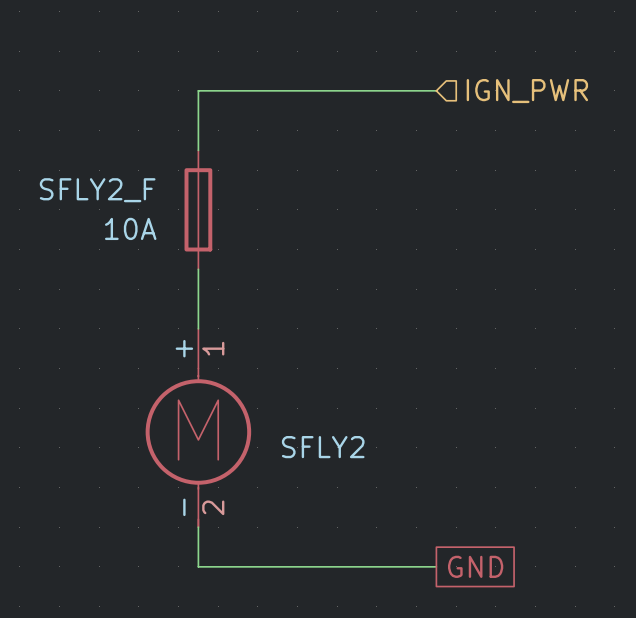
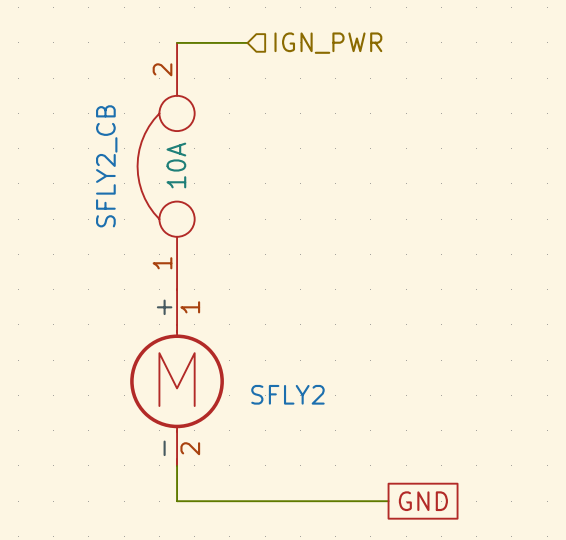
wire: none -> (177, 42) (247, 42)
wire: (436, 90) (198, 90) (198, 150) -> none
hierarchical label position: IGN_PWR (527, 91) -> IGN_PWR (328, 43)
SFLY2_CB: none -> 10A (166, 166)
SFLY2_F: 10A (198, 209) -> none

